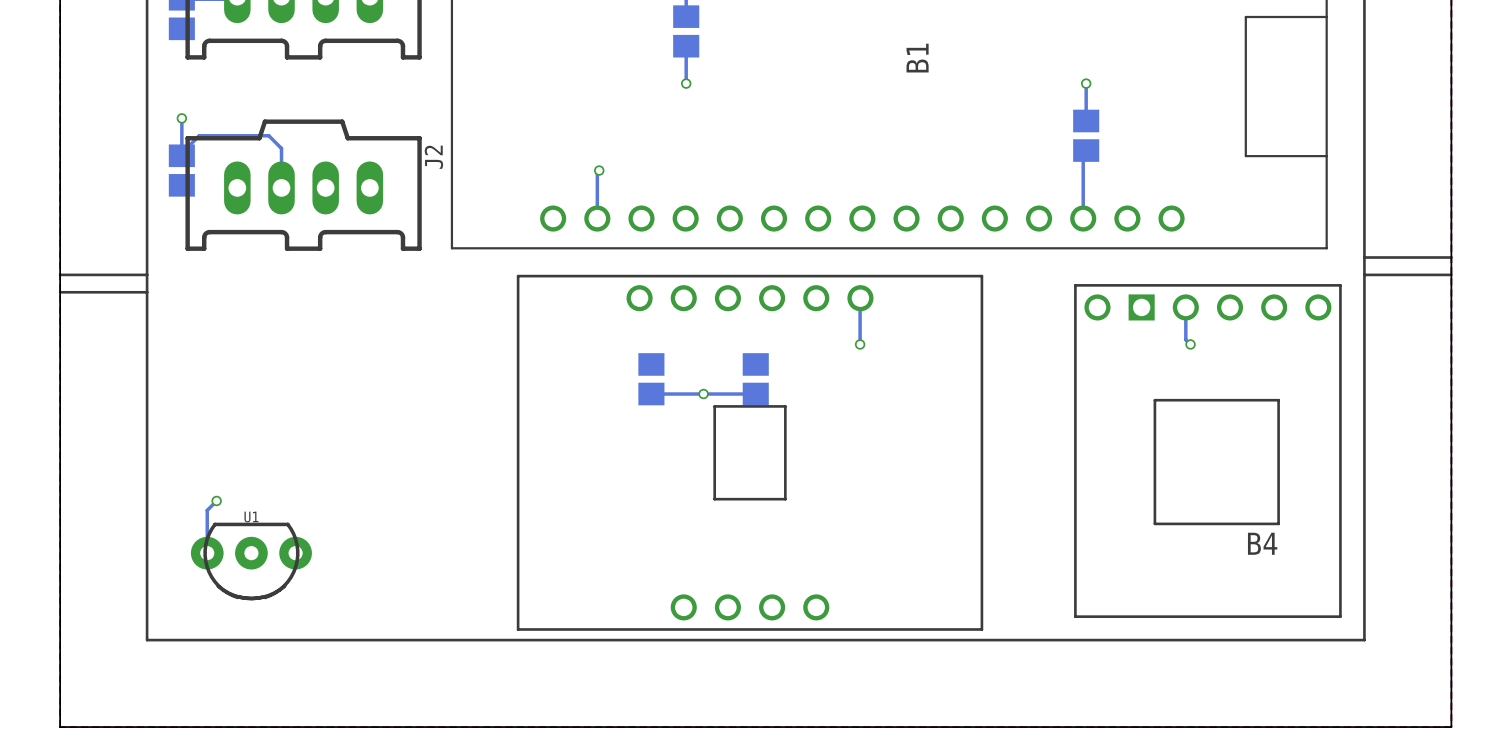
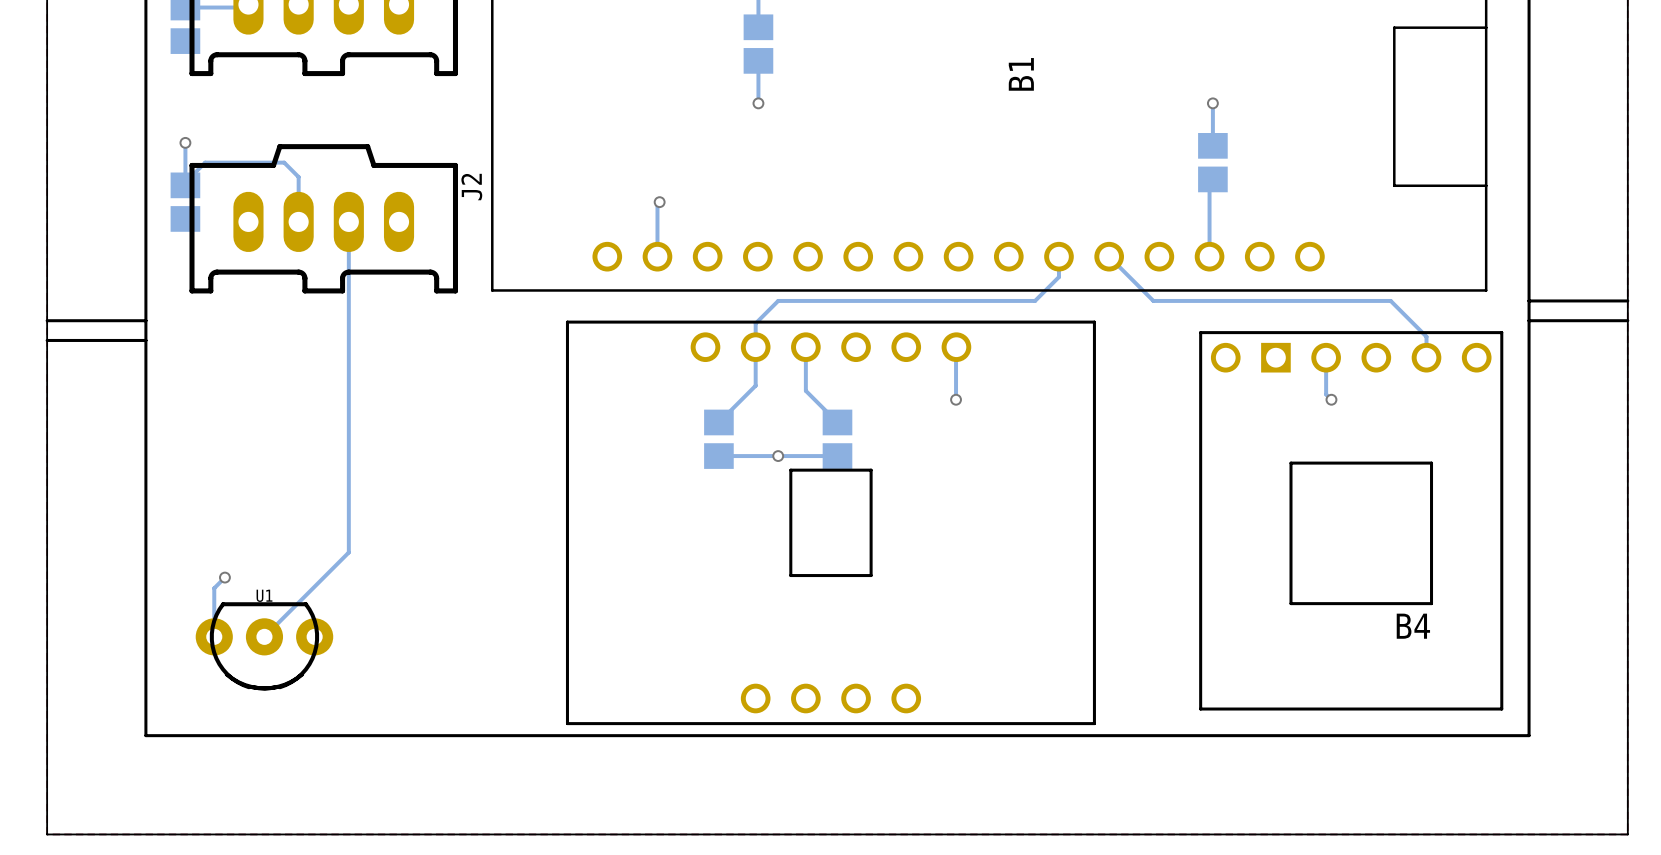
bottom track: none -> (348, 221) (348, 552) (264, 636)
bottom track: none -> (1058, 256) (1058, 277) (1035, 300) (778, 300) (755, 323) (755, 385) (718, 422)
bottom track: none -> (1109, 256) (1153, 300) (1390, 300) (1426, 336) (1426, 357)
bottom track: none -> (805, 347) (805, 390) (837, 422)

